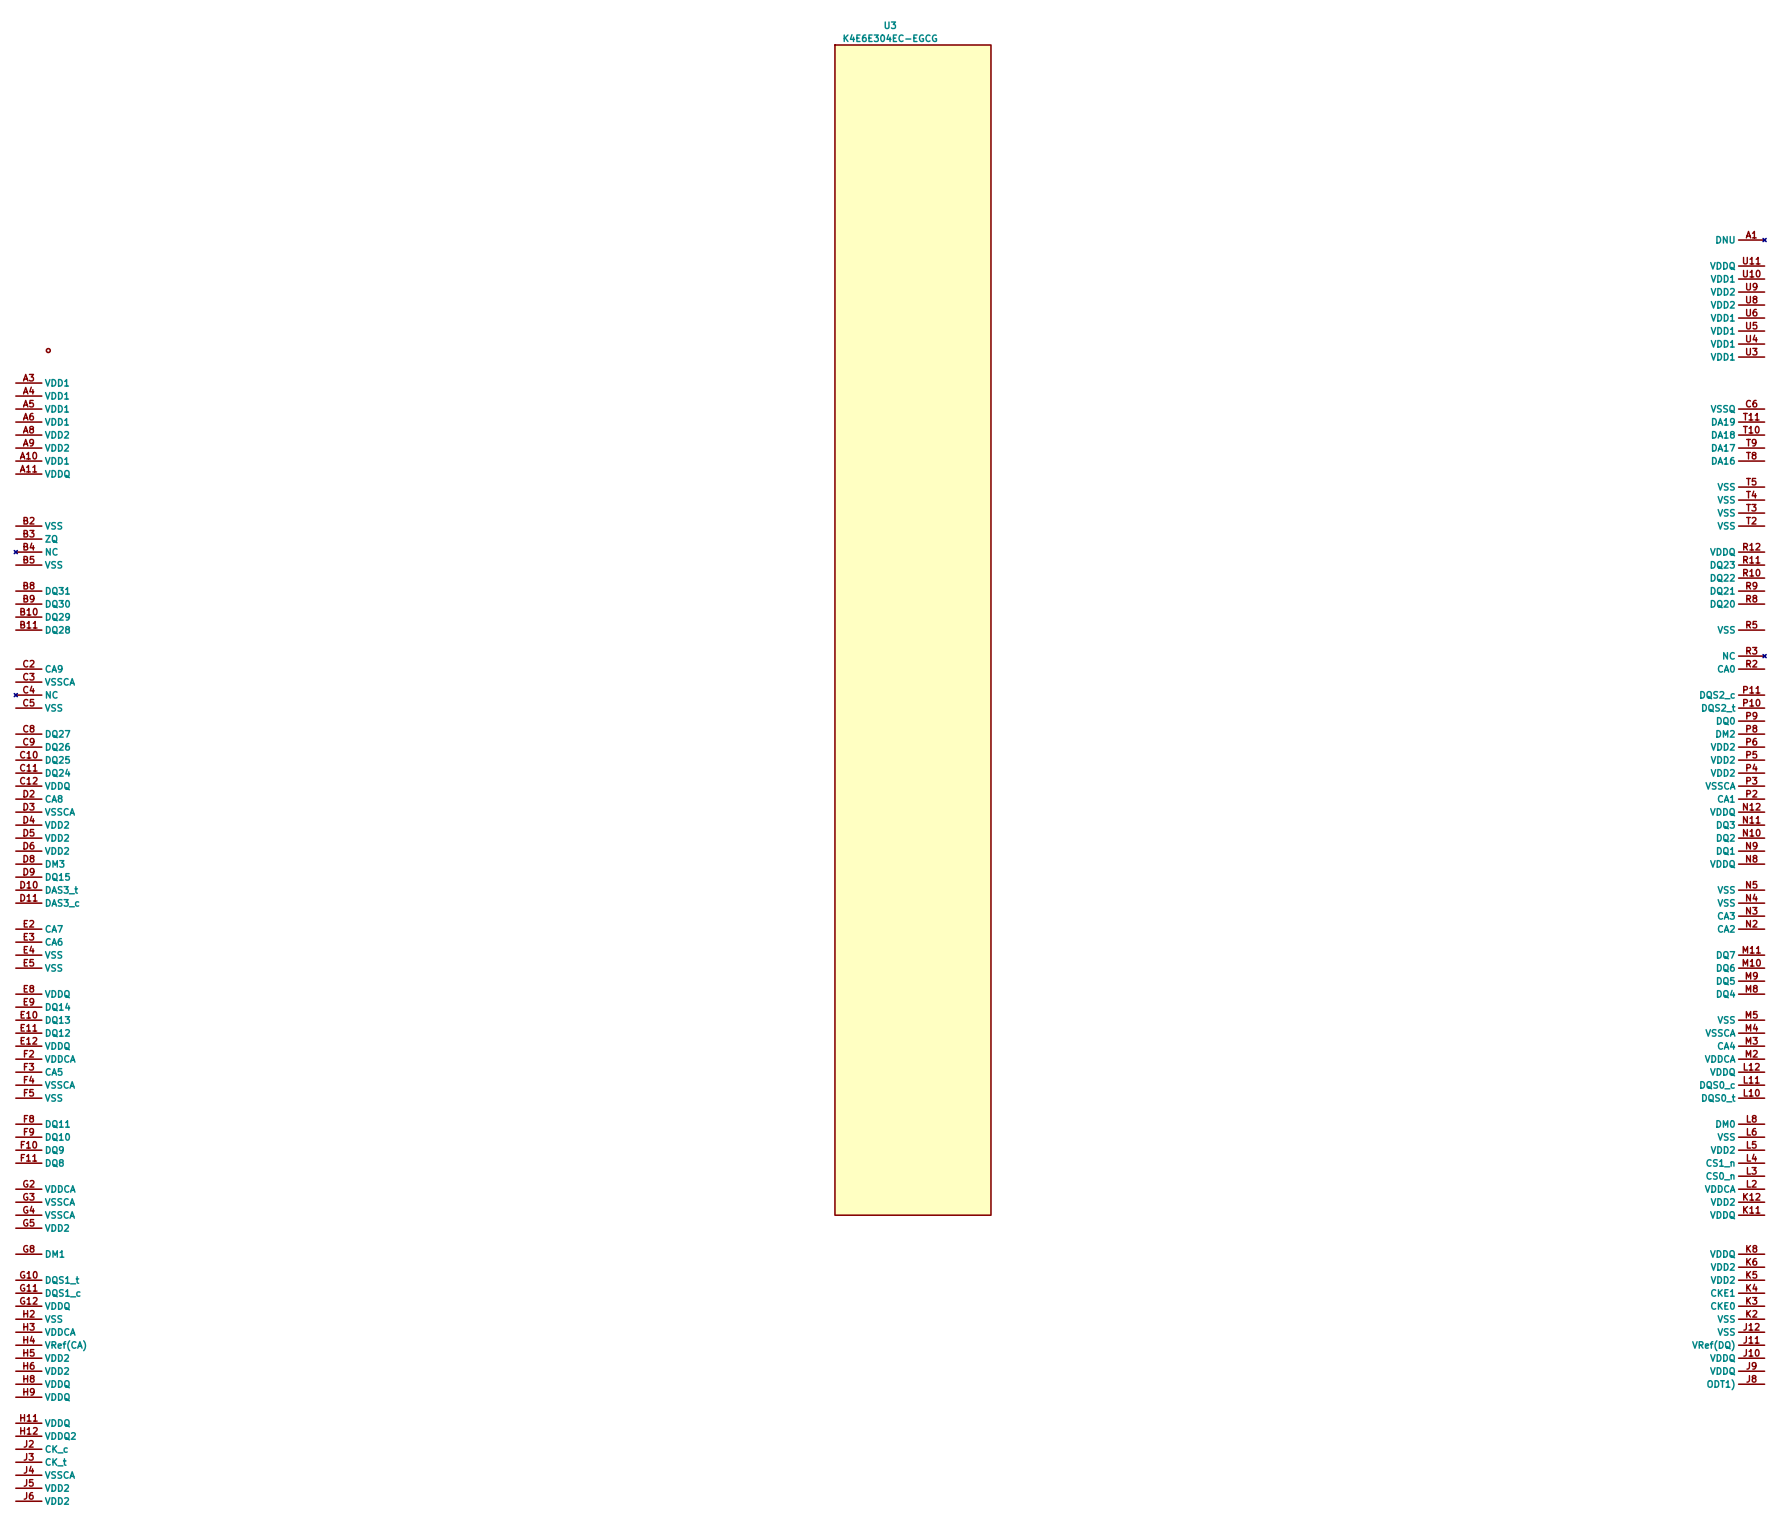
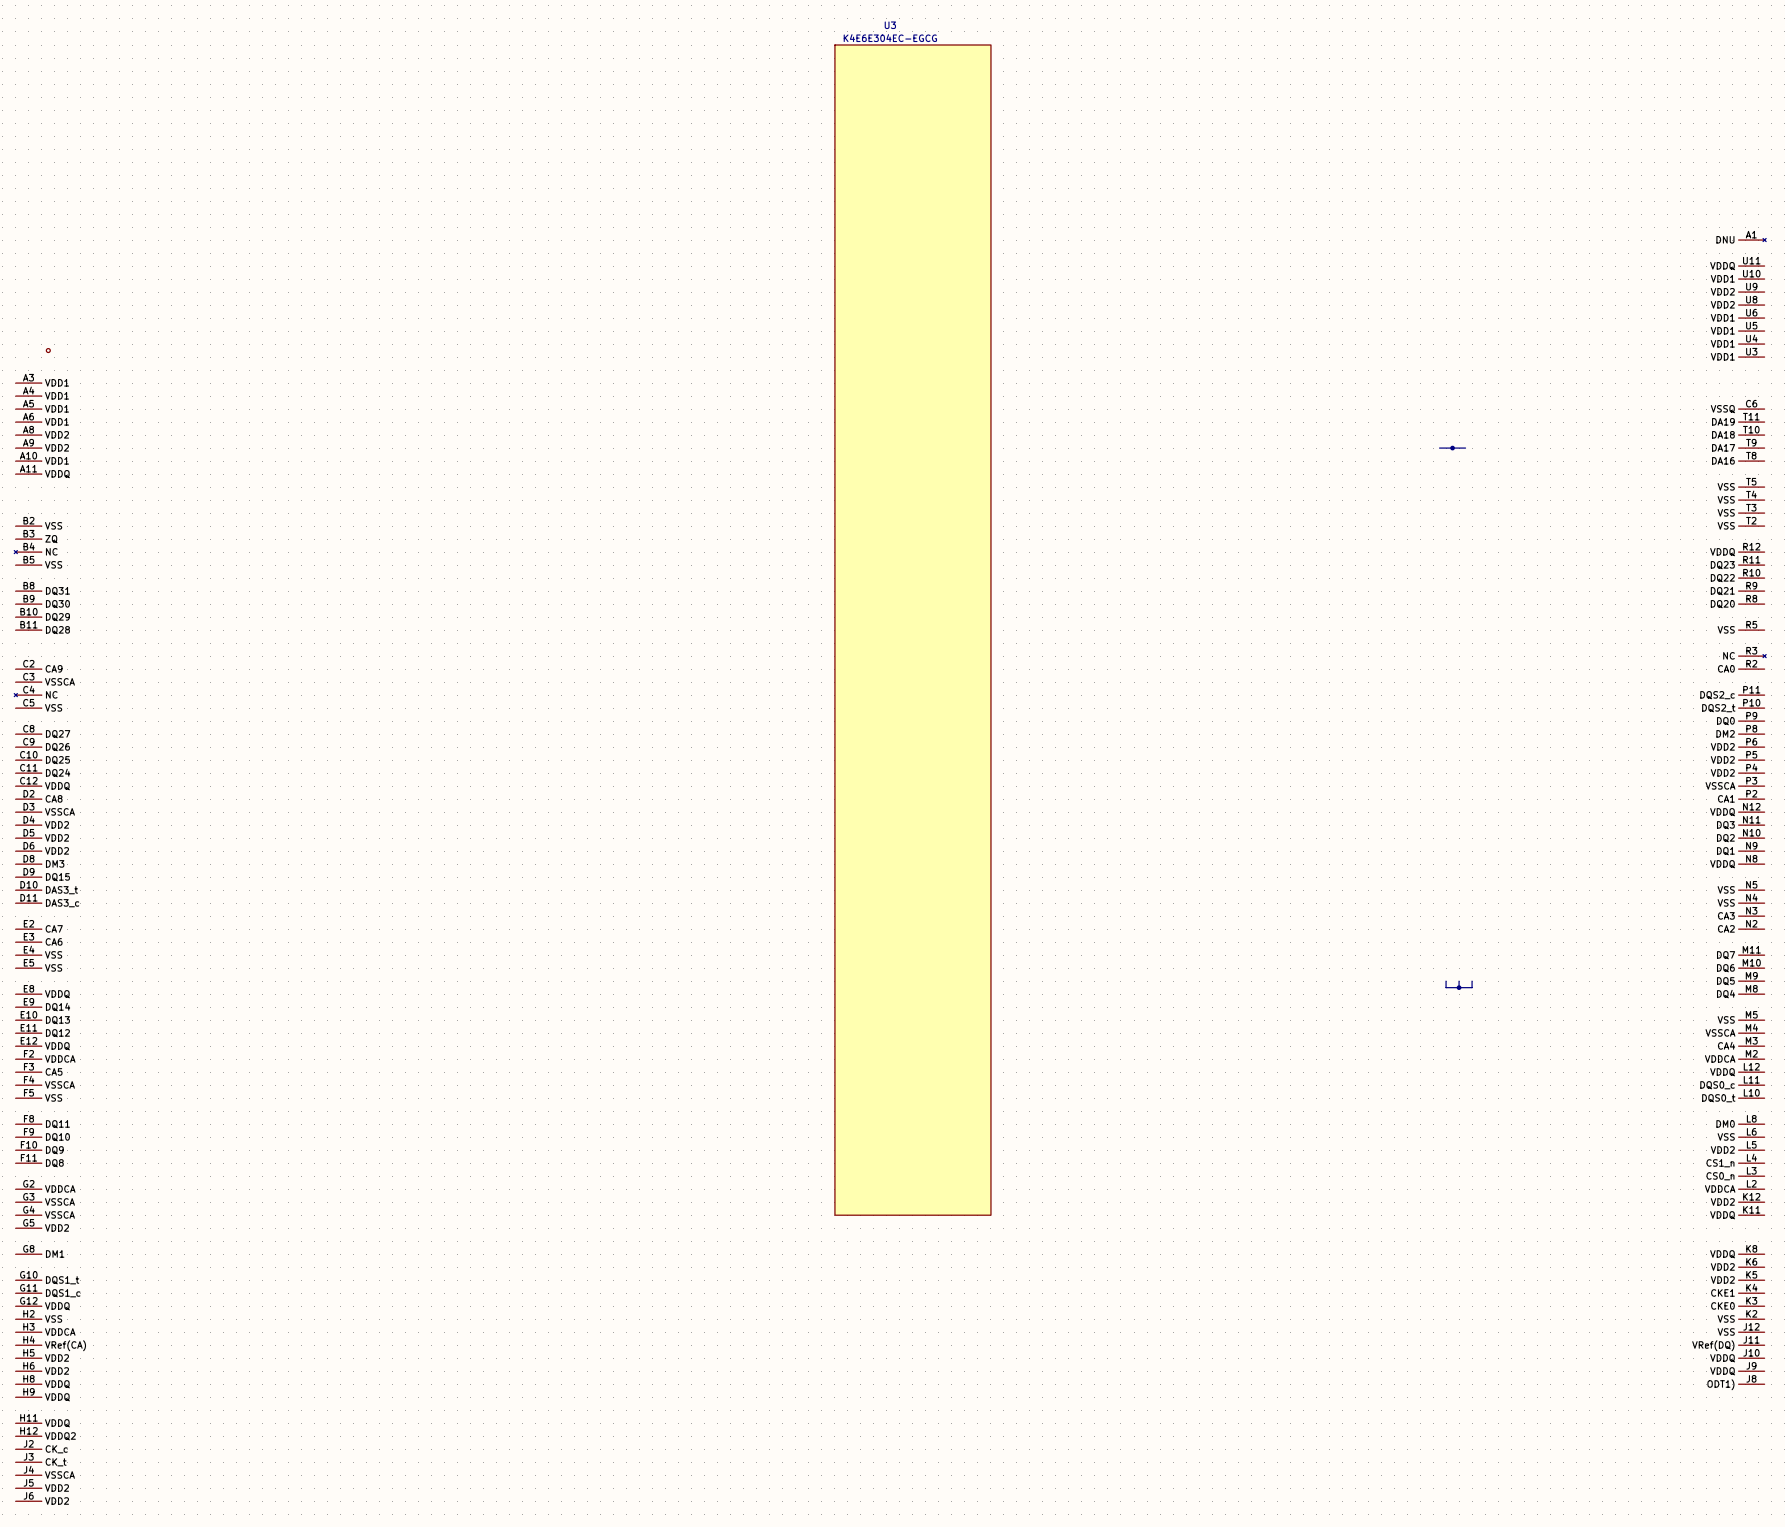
wire: none -> (1439, 448) (1465, 448)
junction: none -> (1452, 448)
wire: none -> (1446, 981) (1446, 987) (1472, 987) (1472, 981)
wire: none -> (1459, 981) (1459, 987)
junction: none -> (1459, 987)

